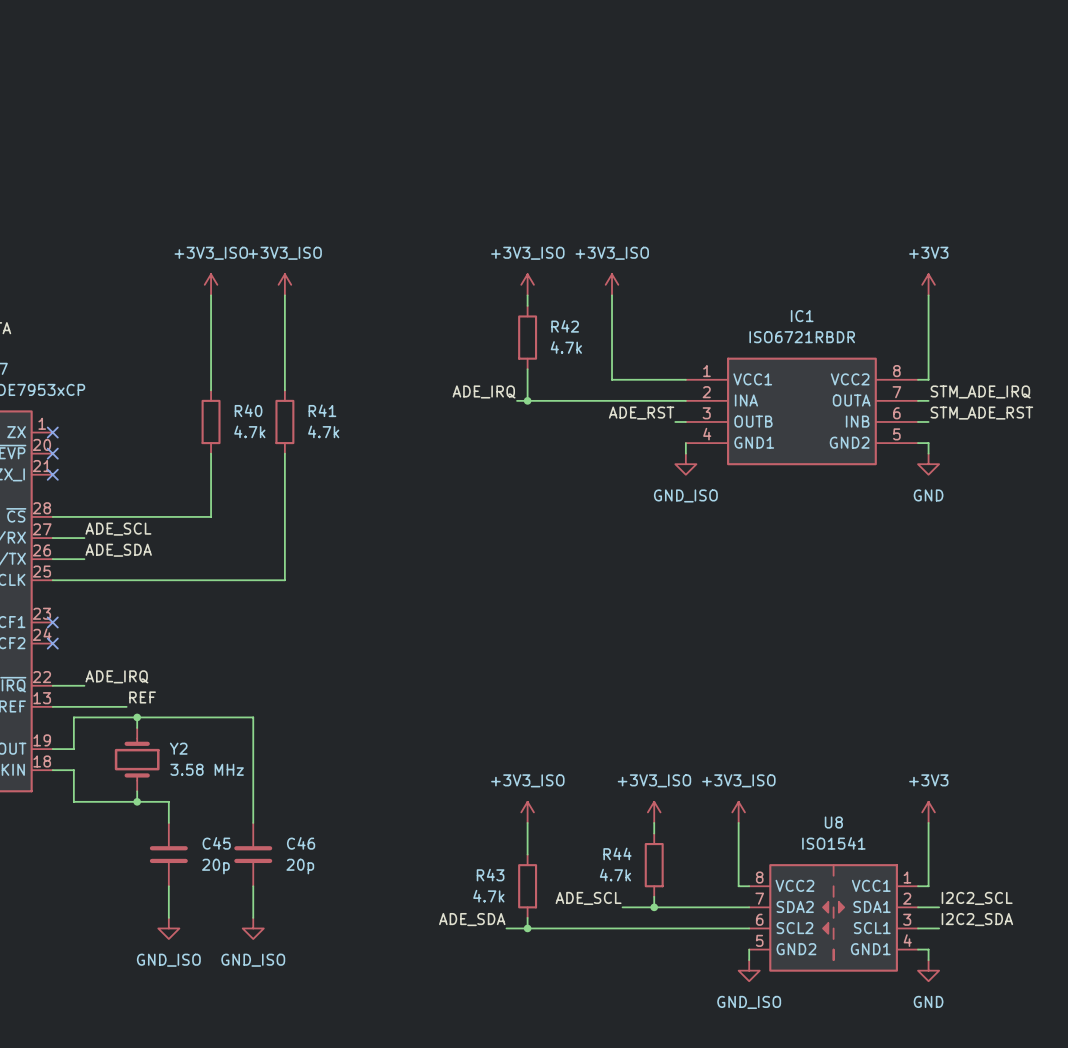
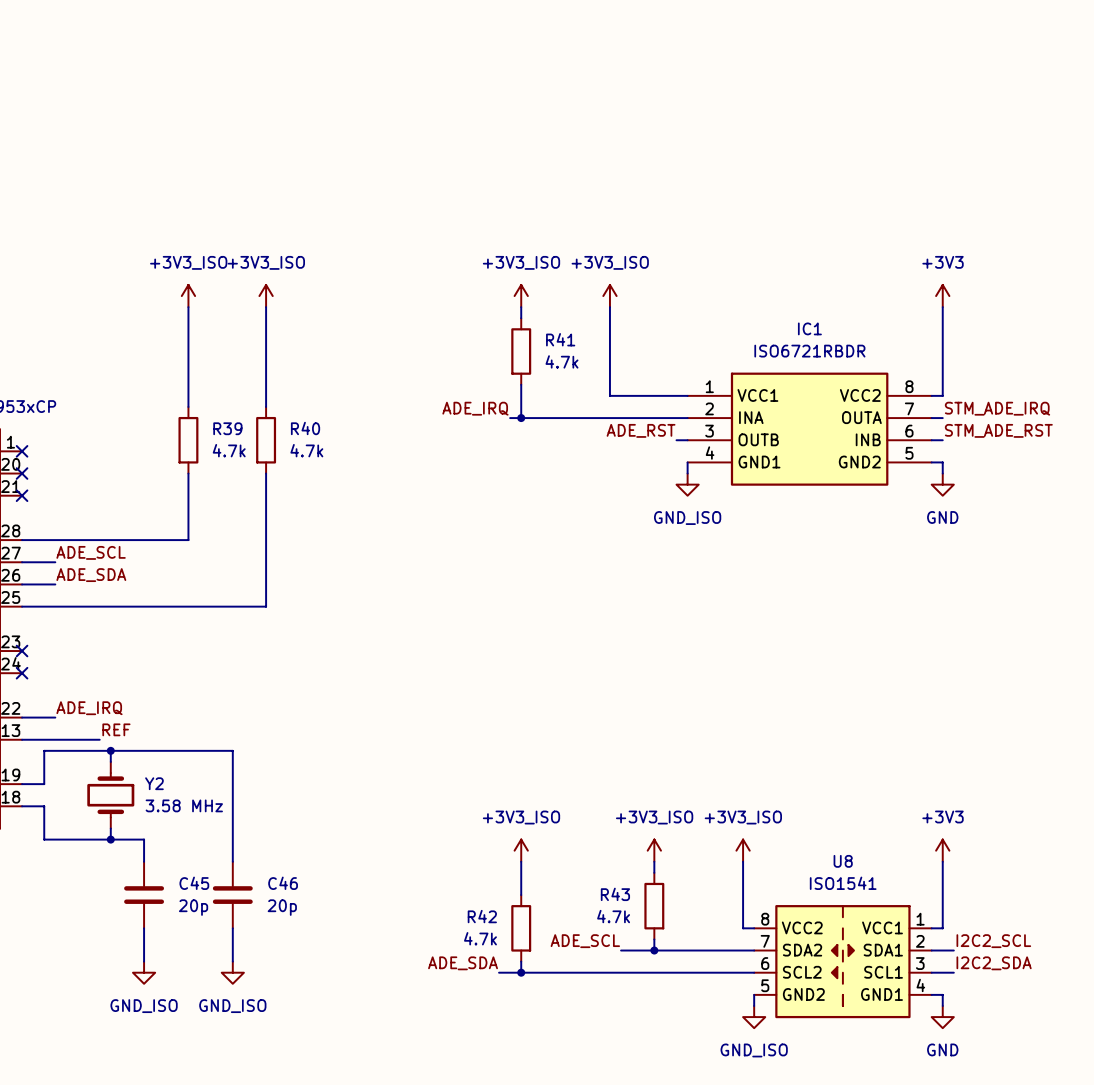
R42 name: R42 (565, 326) -> R41 (560, 339)
R40 name: R40 (248, 410) -> R39 (227, 428)
R41 name: R41 (322, 410) -> R40 (305, 428)
R44 name: R44 (617, 853) -> R43 (615, 894)
R43 name: R43 (490, 875) -> R42 (482, 916)

